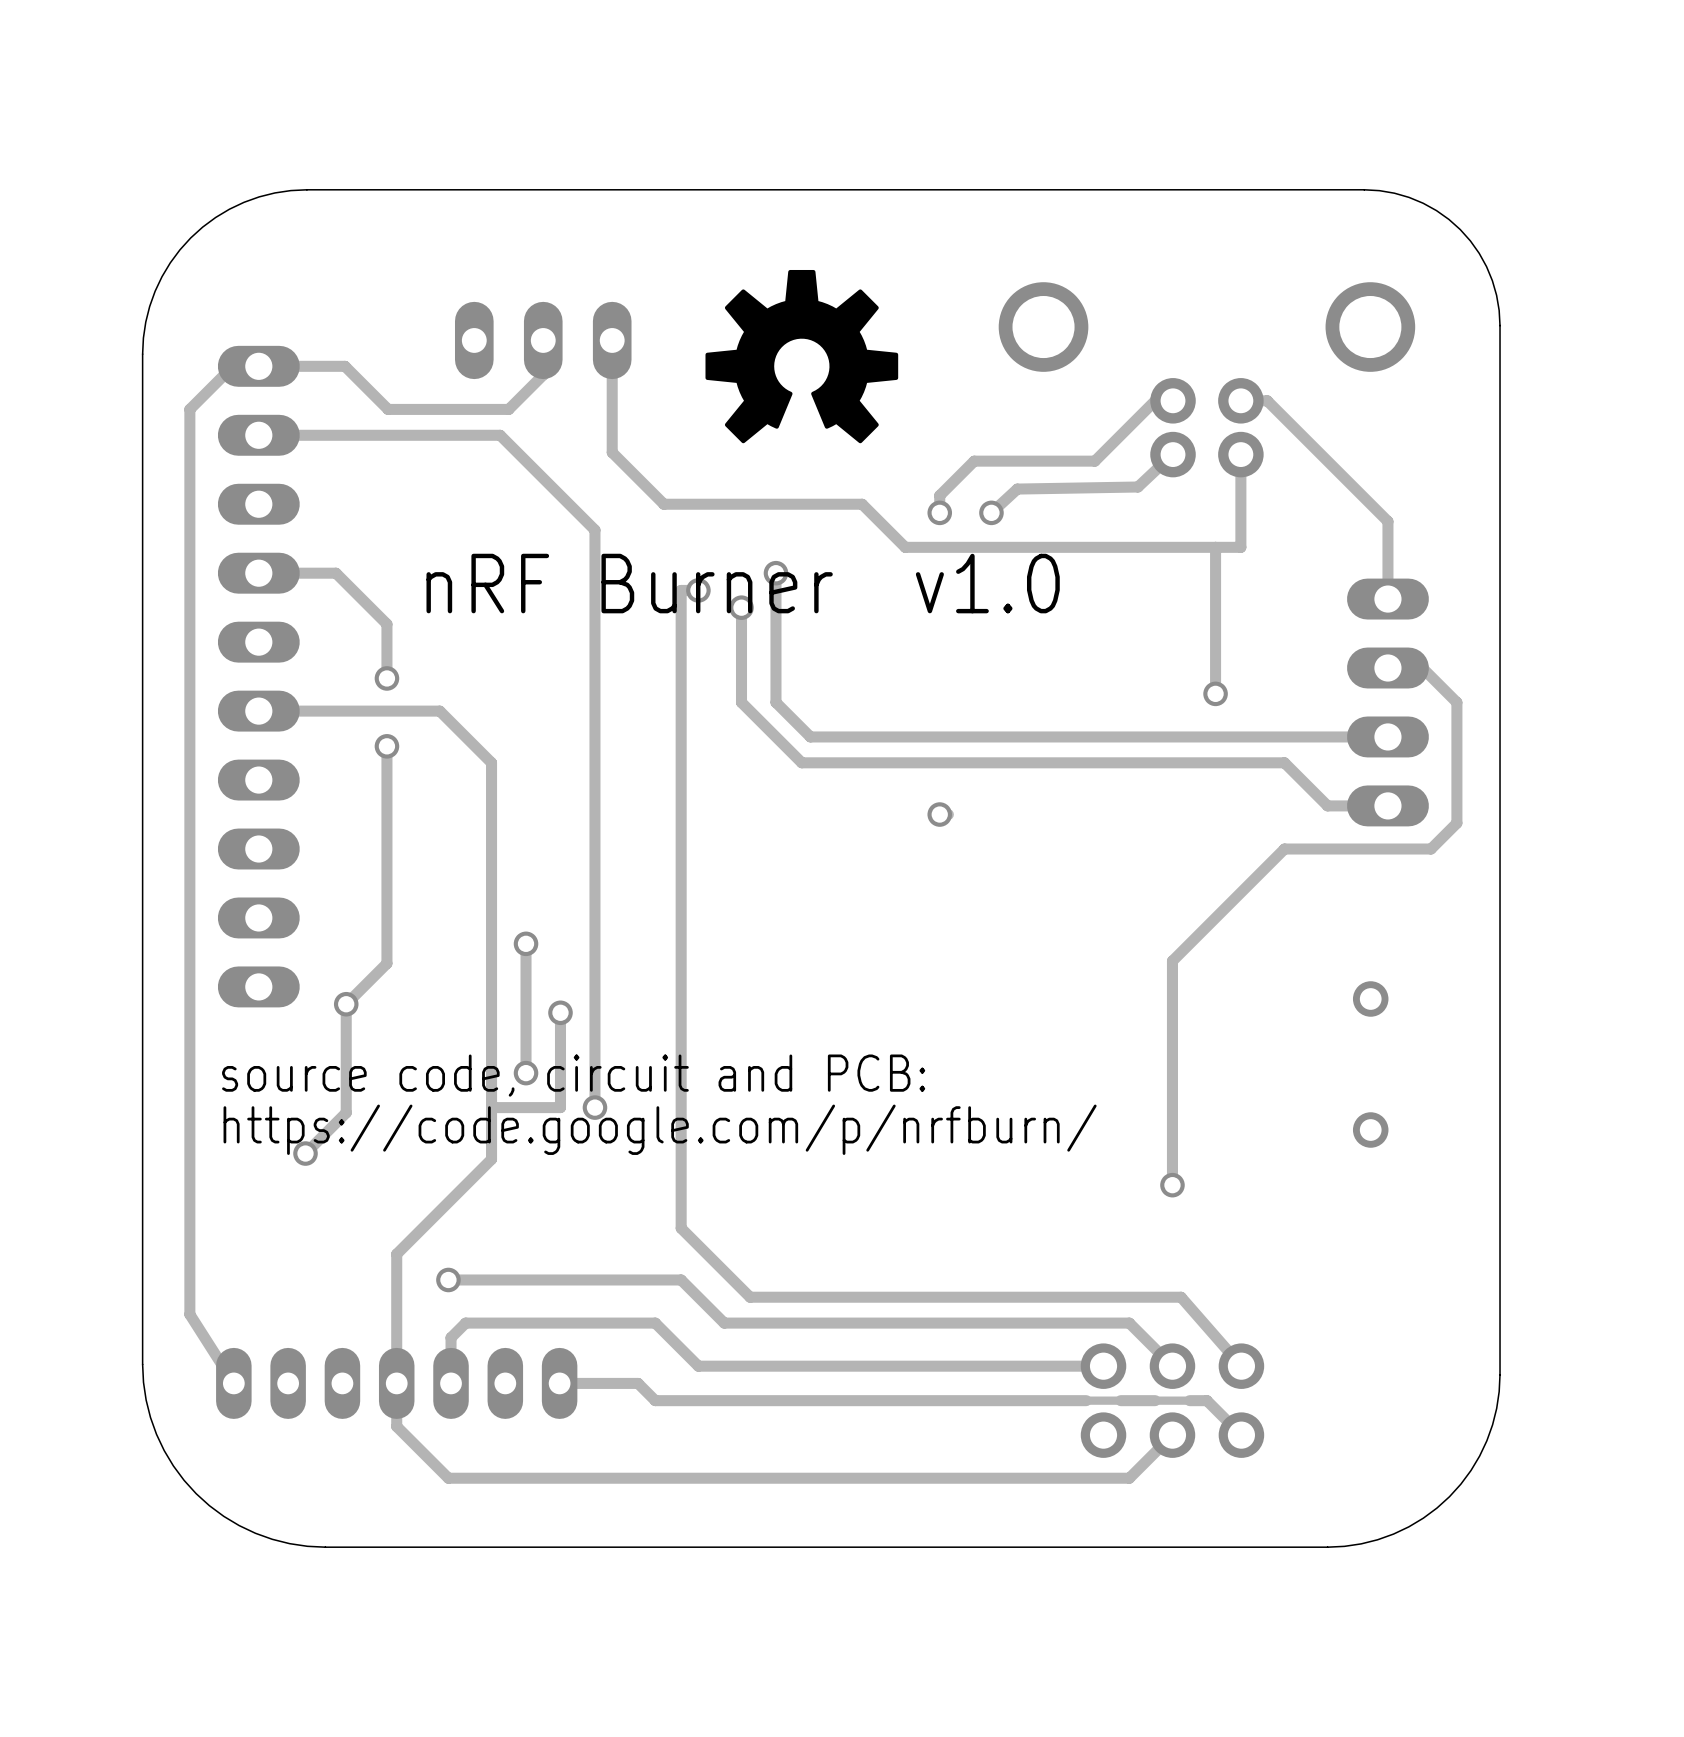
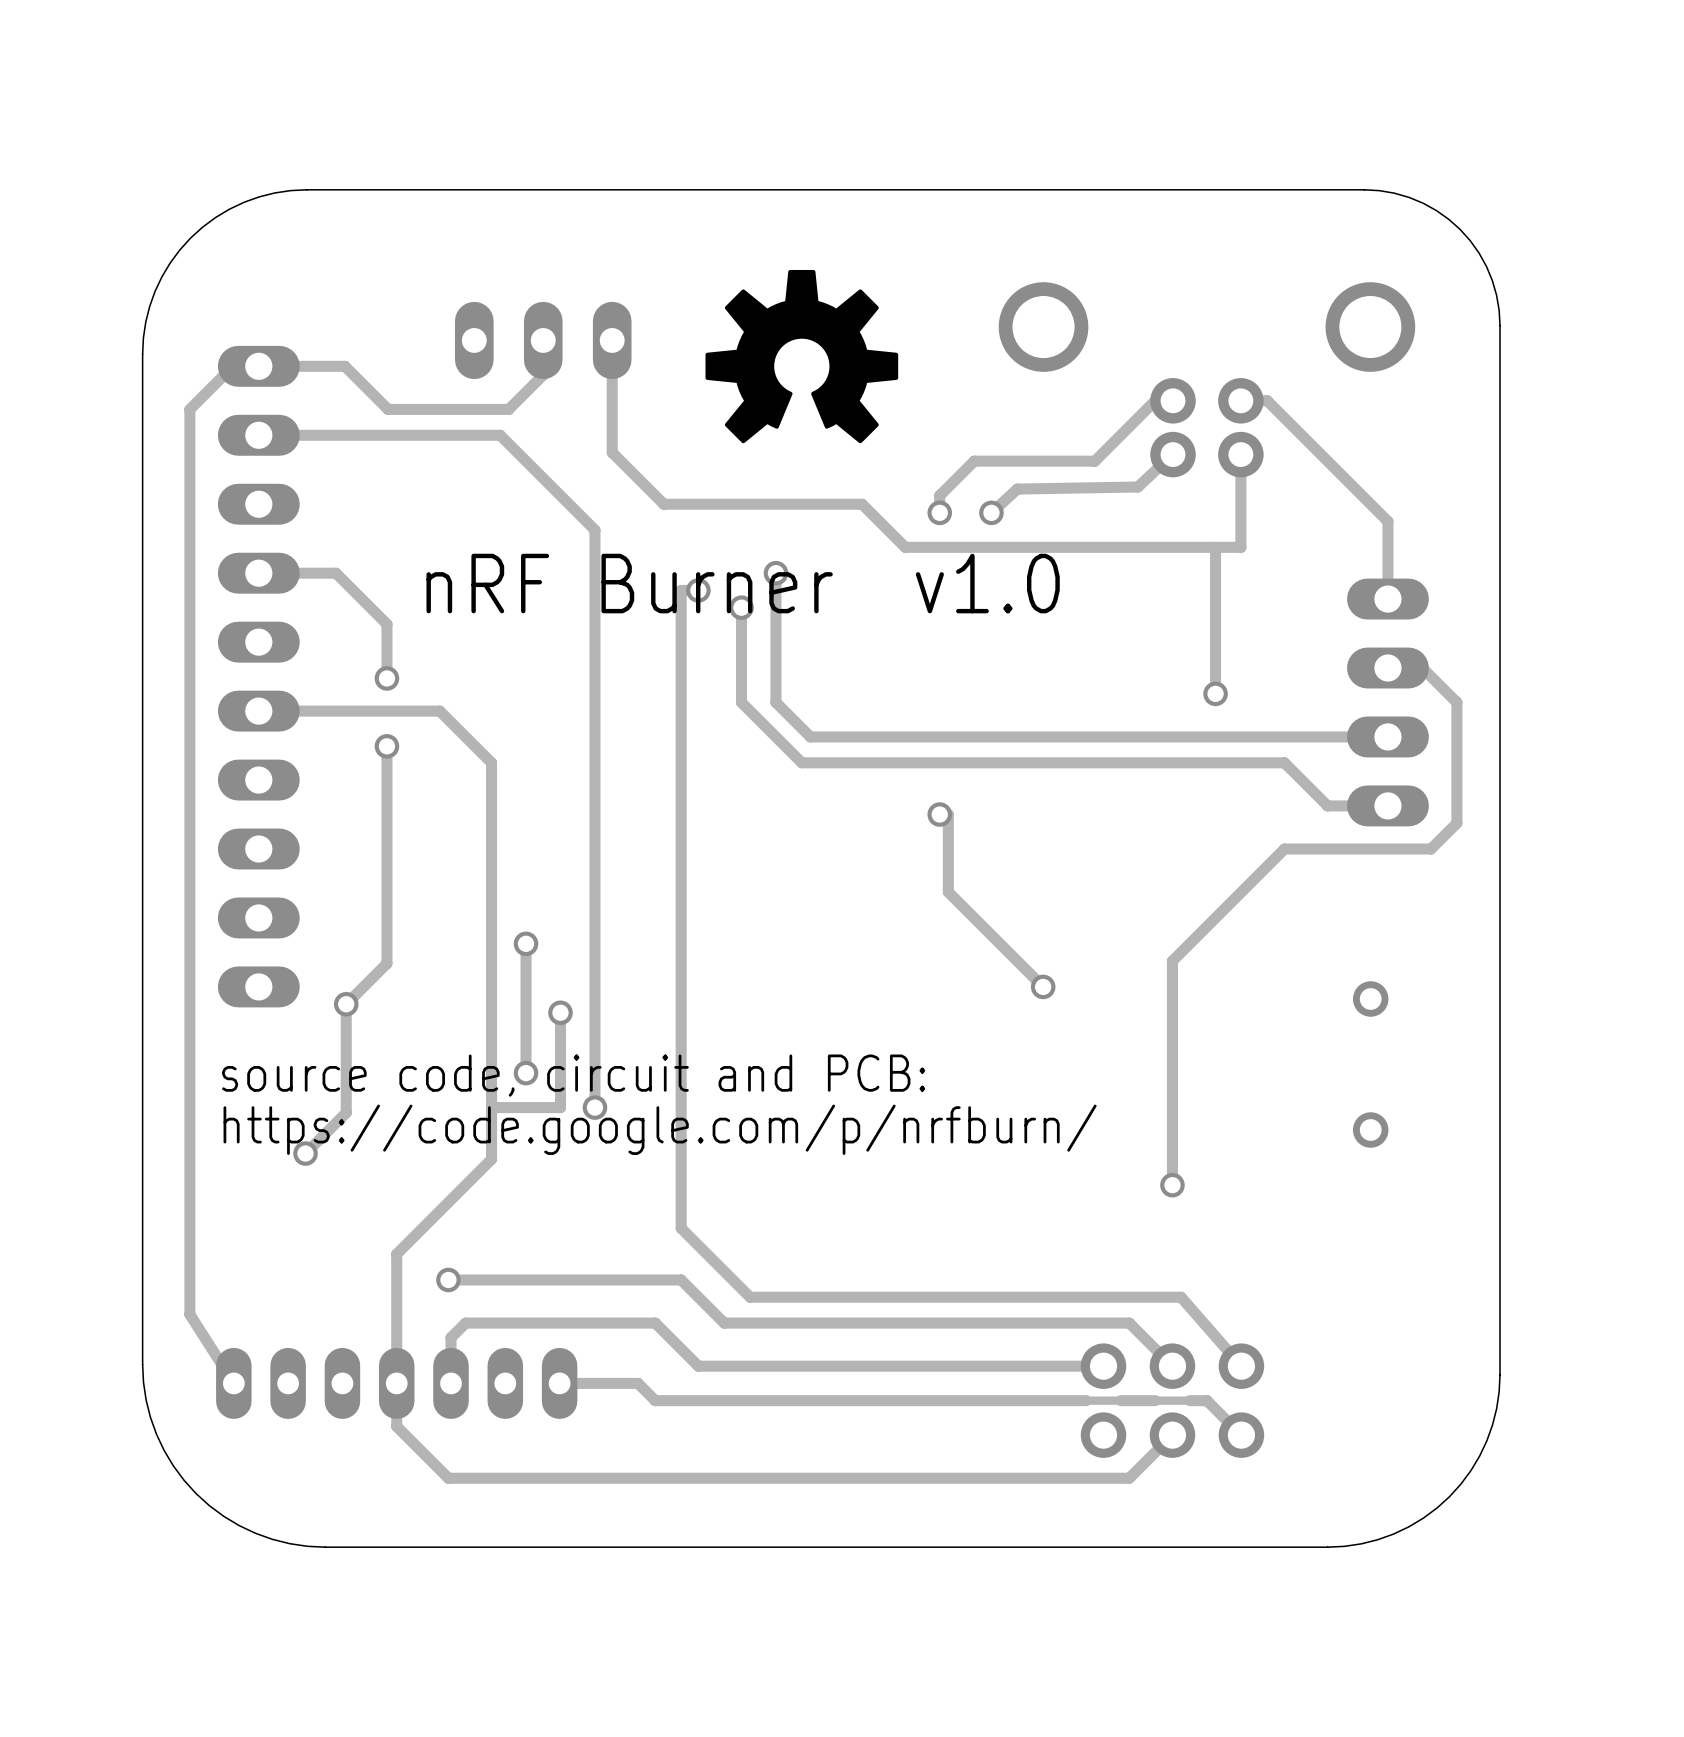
track: none -> (948, 814) (948, 892) (1043, 986)
via: none -> (1043, 986)

